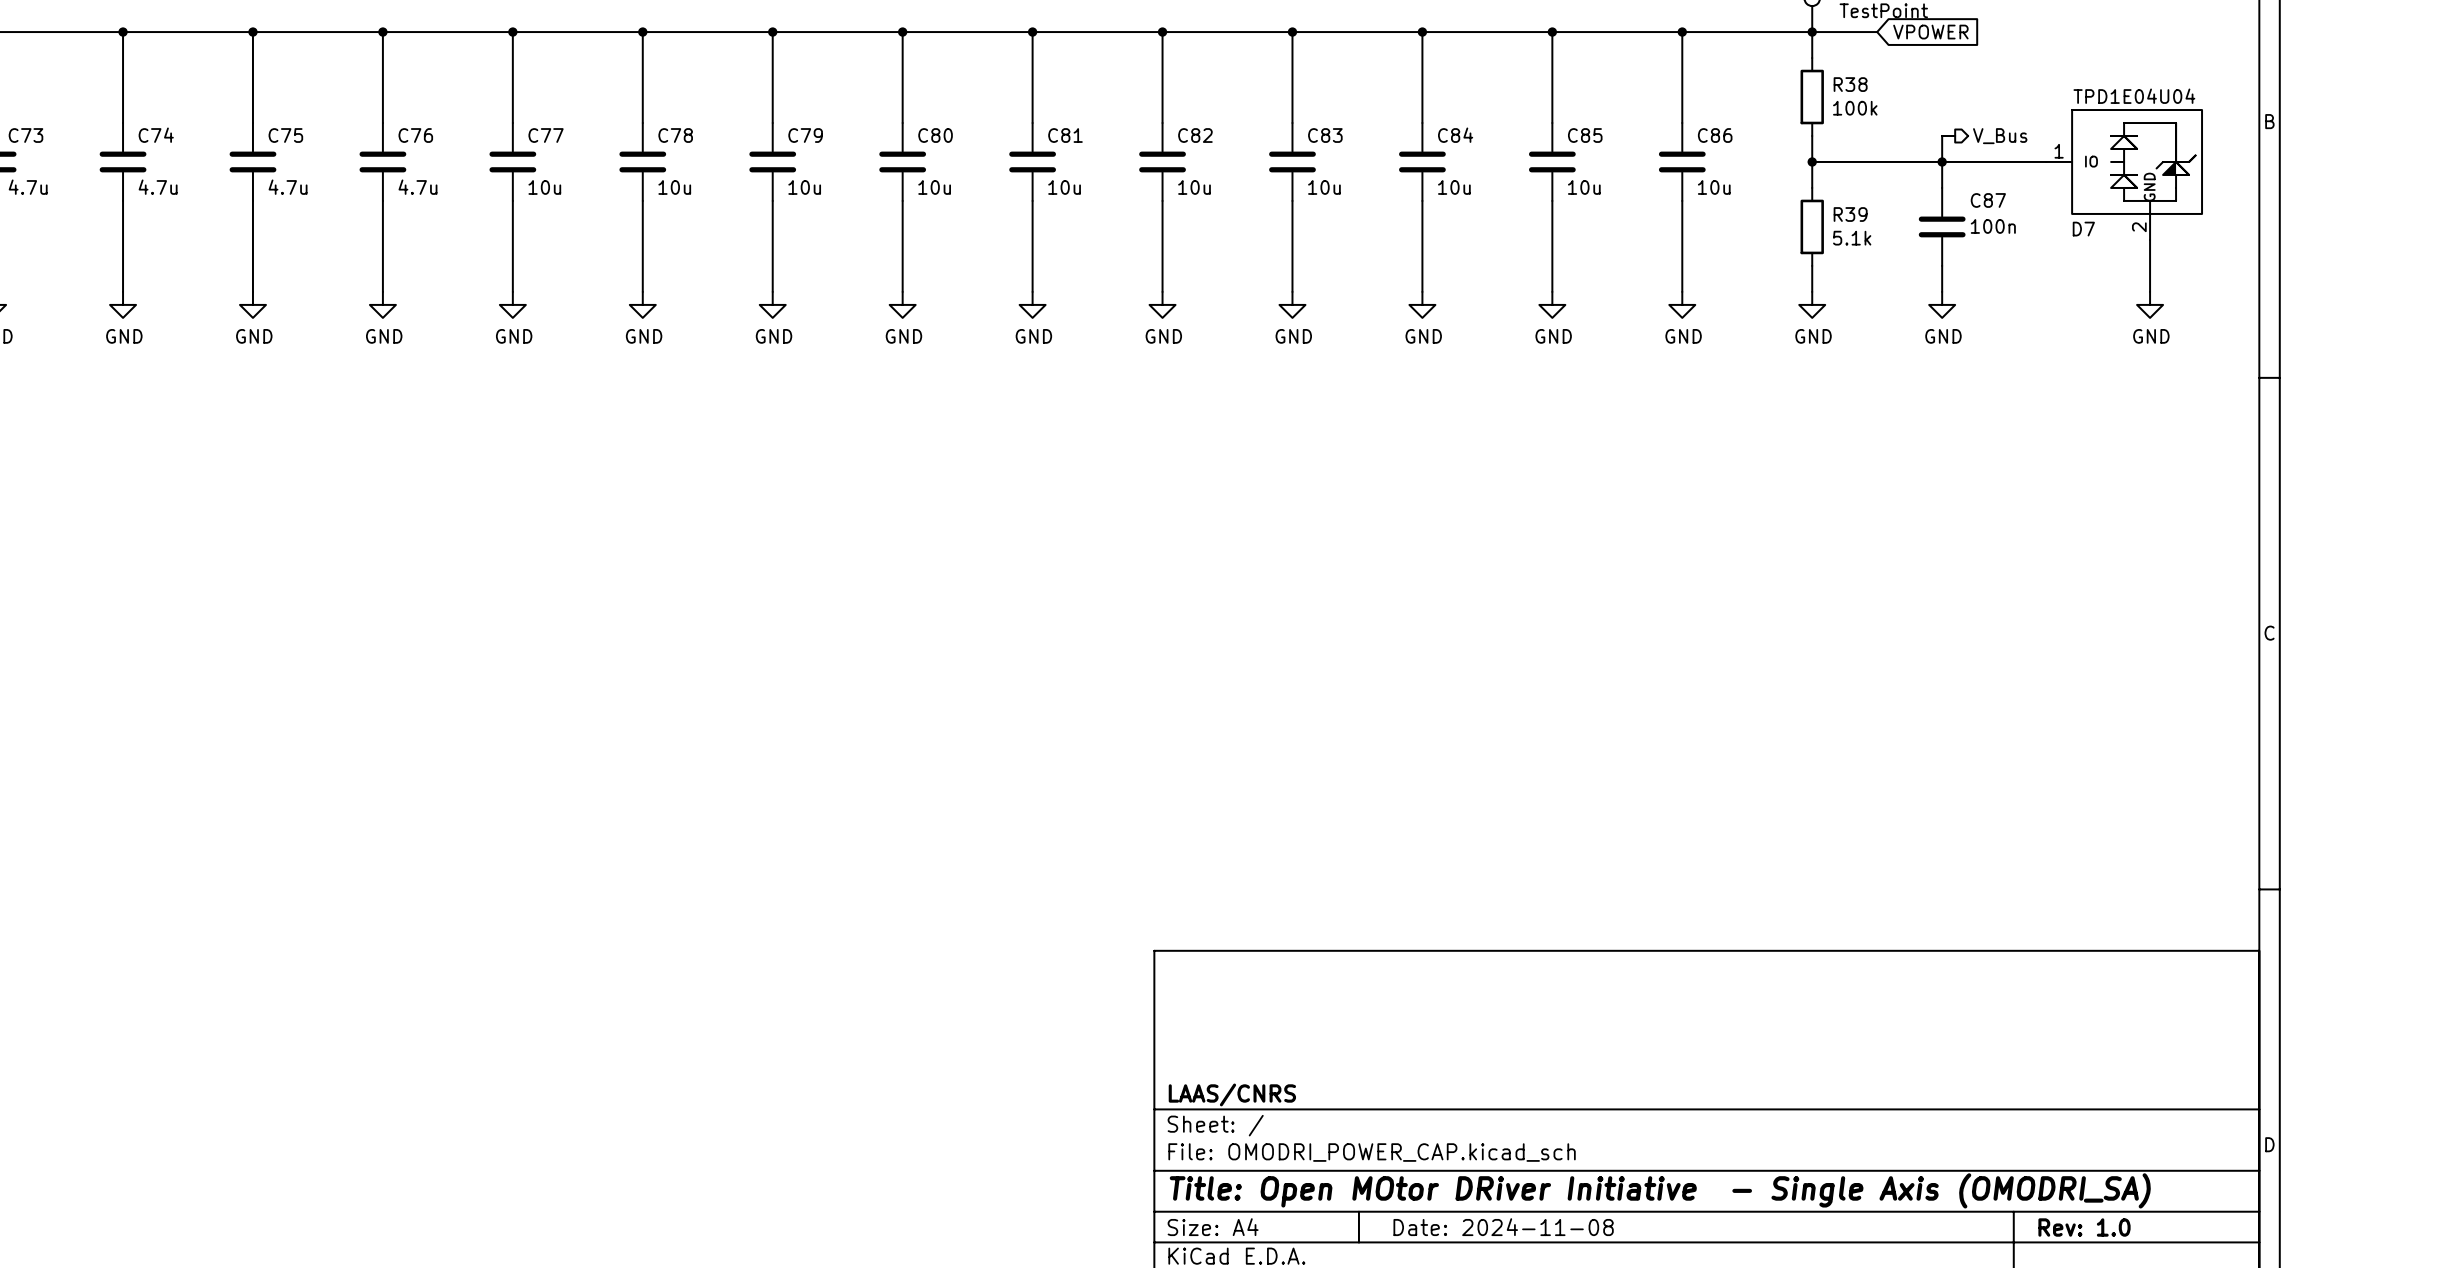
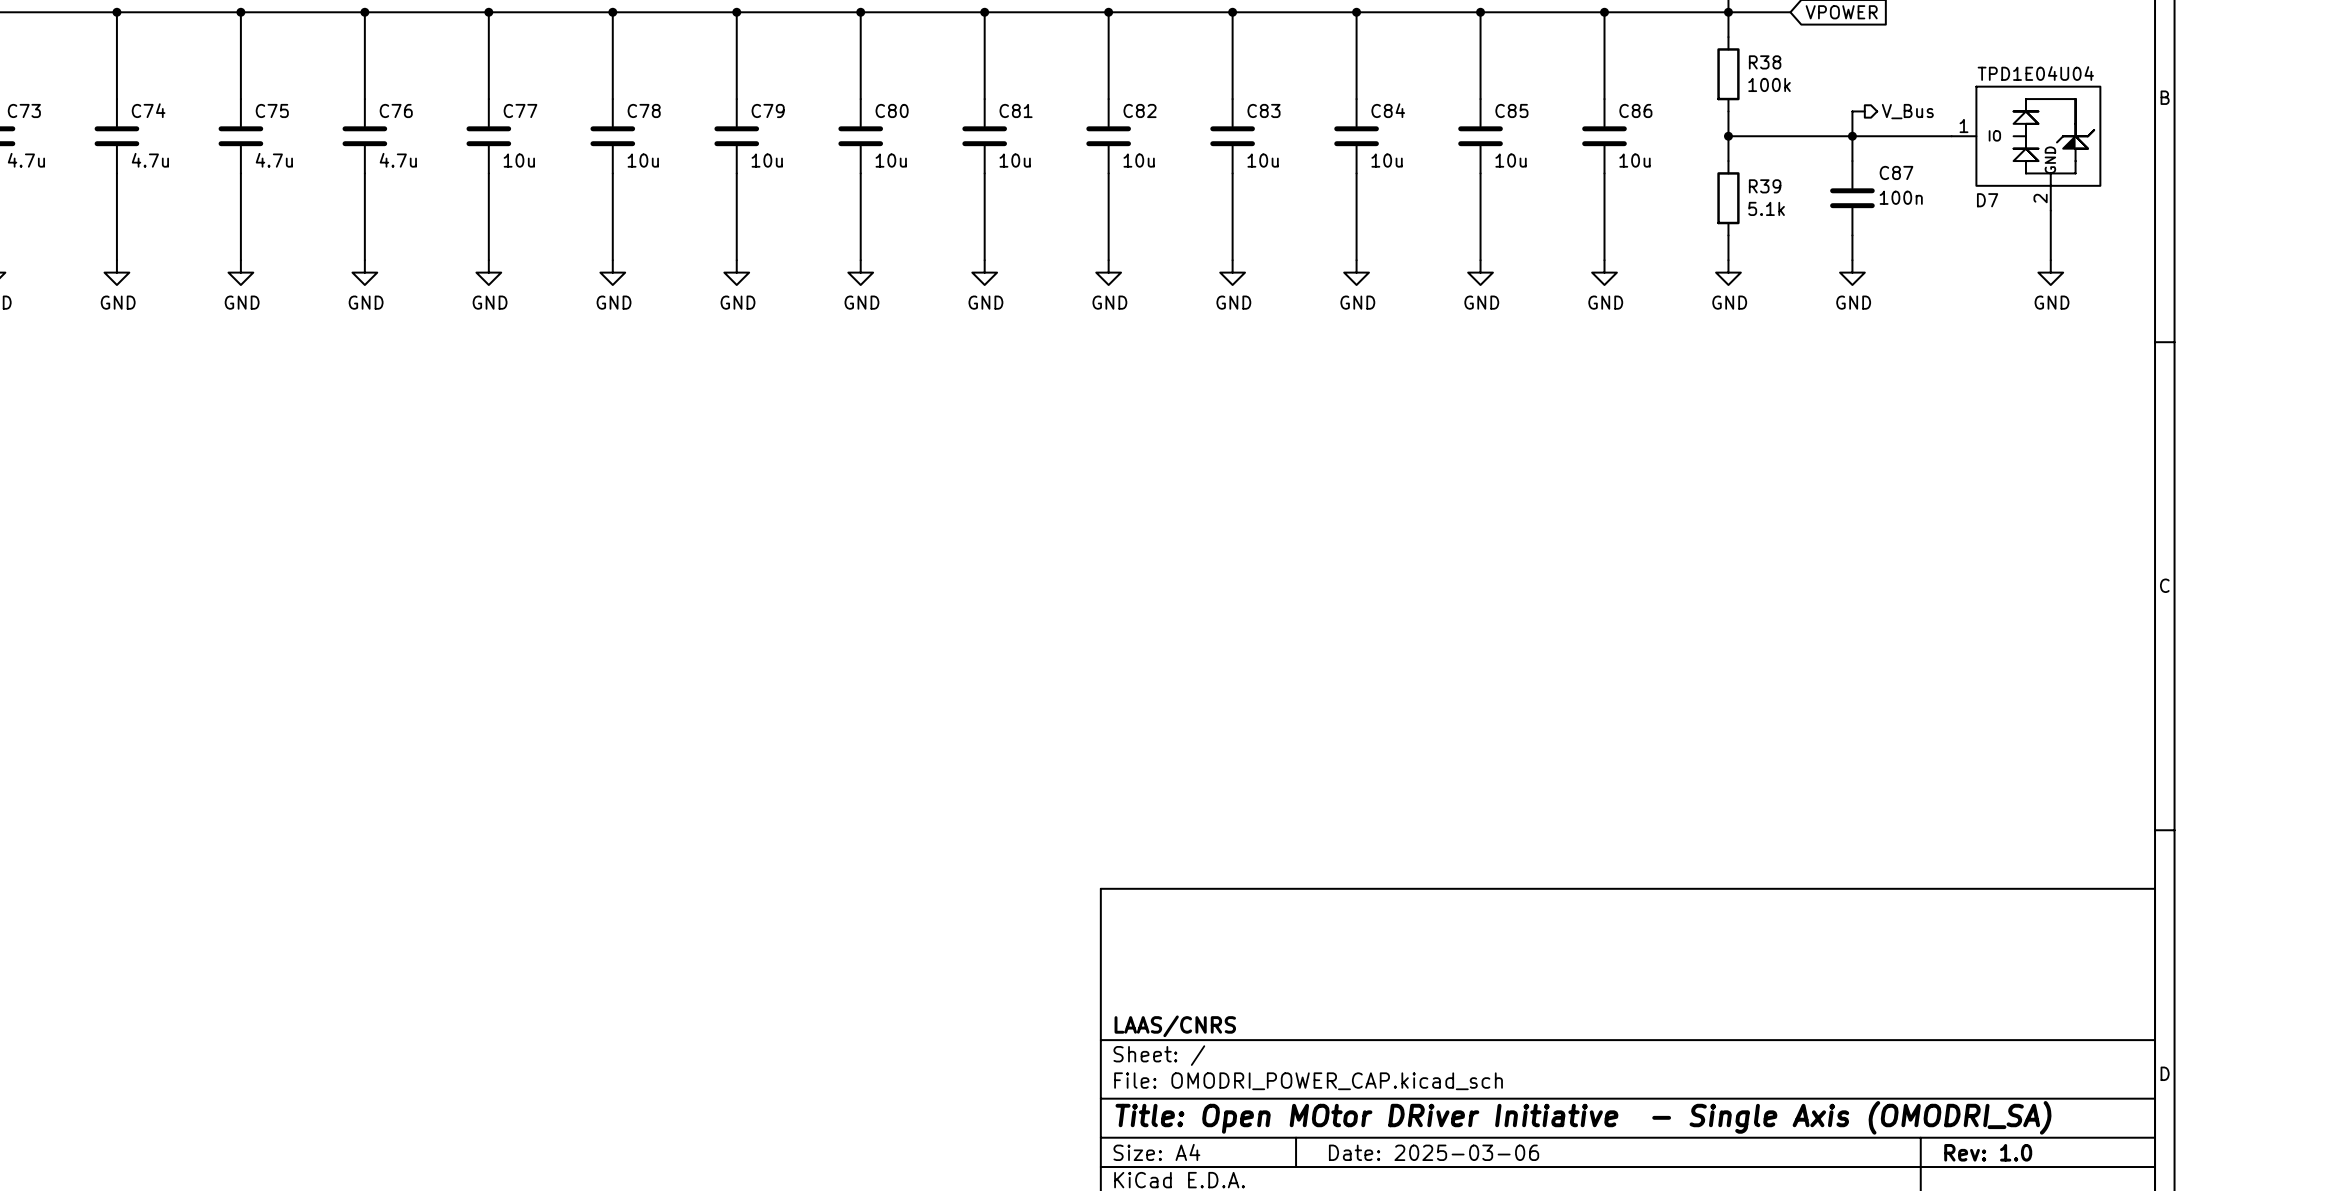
title block: Date: 2024-11-08 (1503, 1227) -> Date: 2025-03-06 (1434, 1152)

